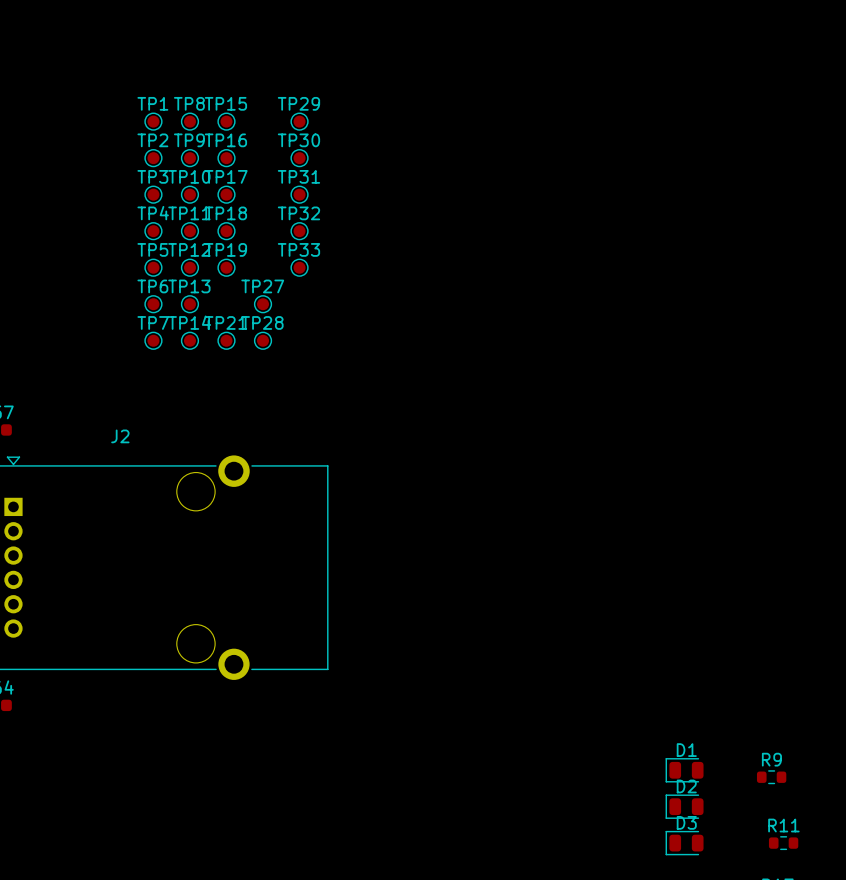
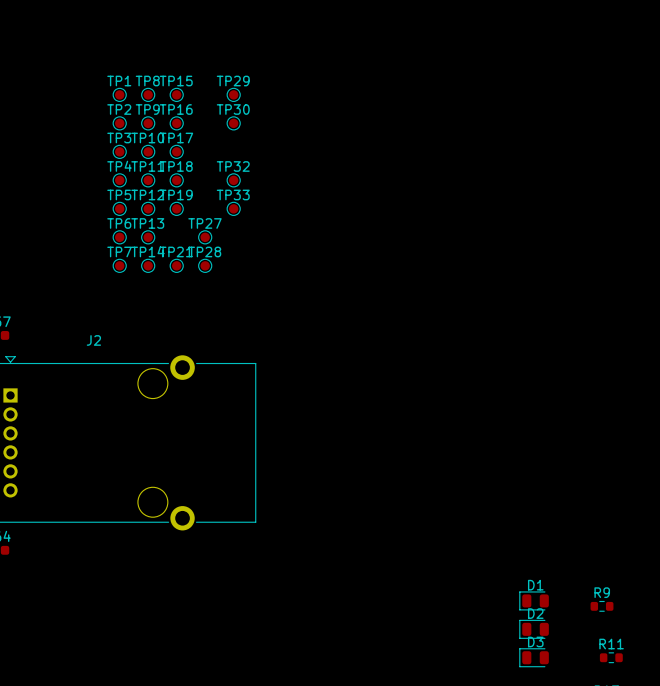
TP31: (299, 194) -> none

